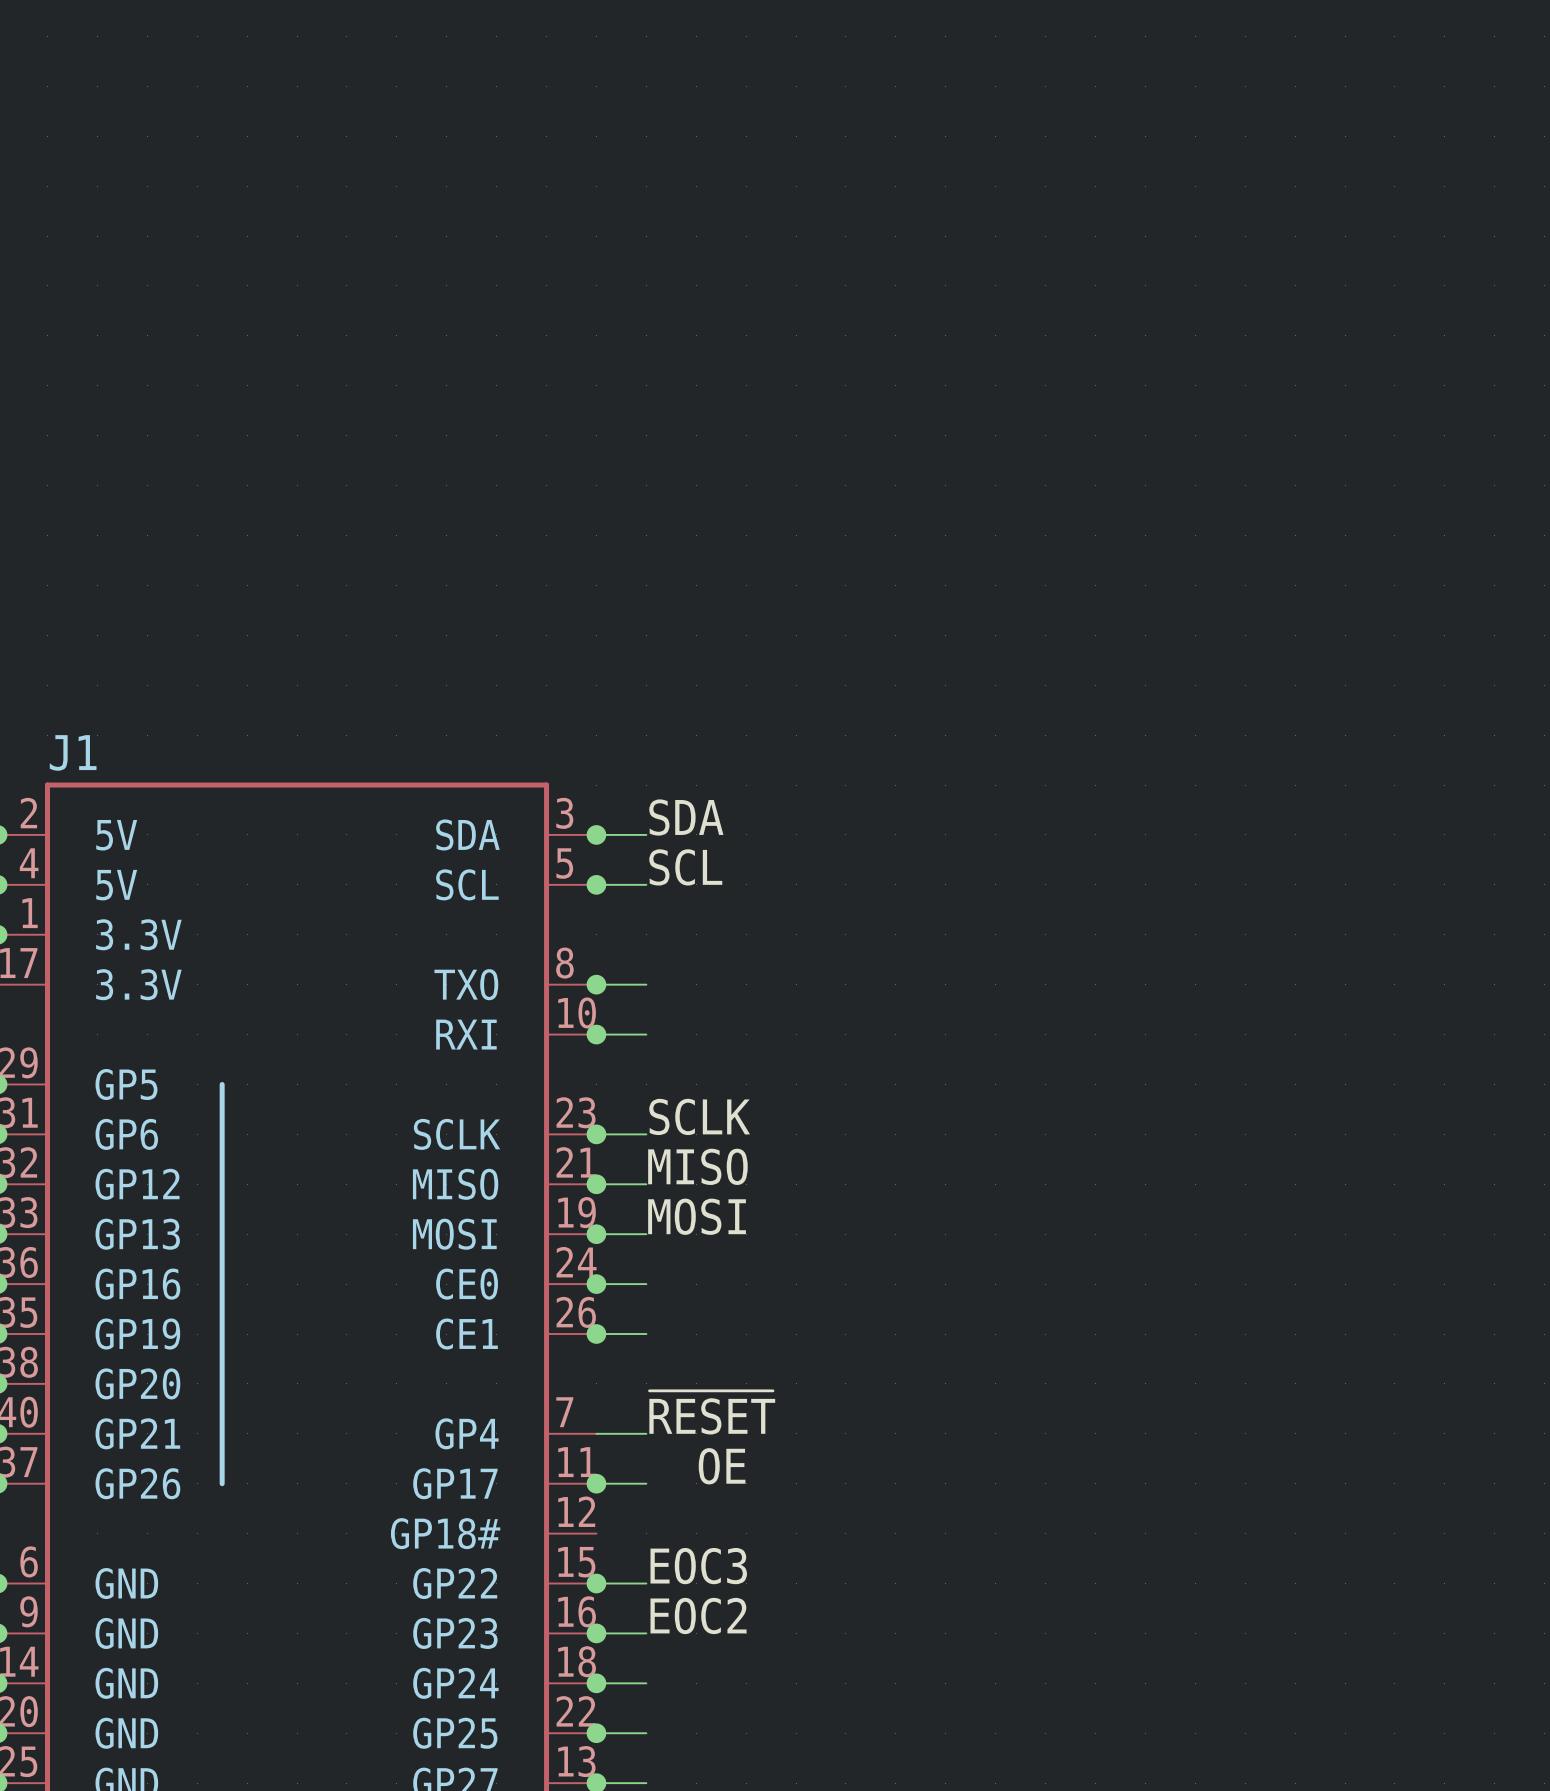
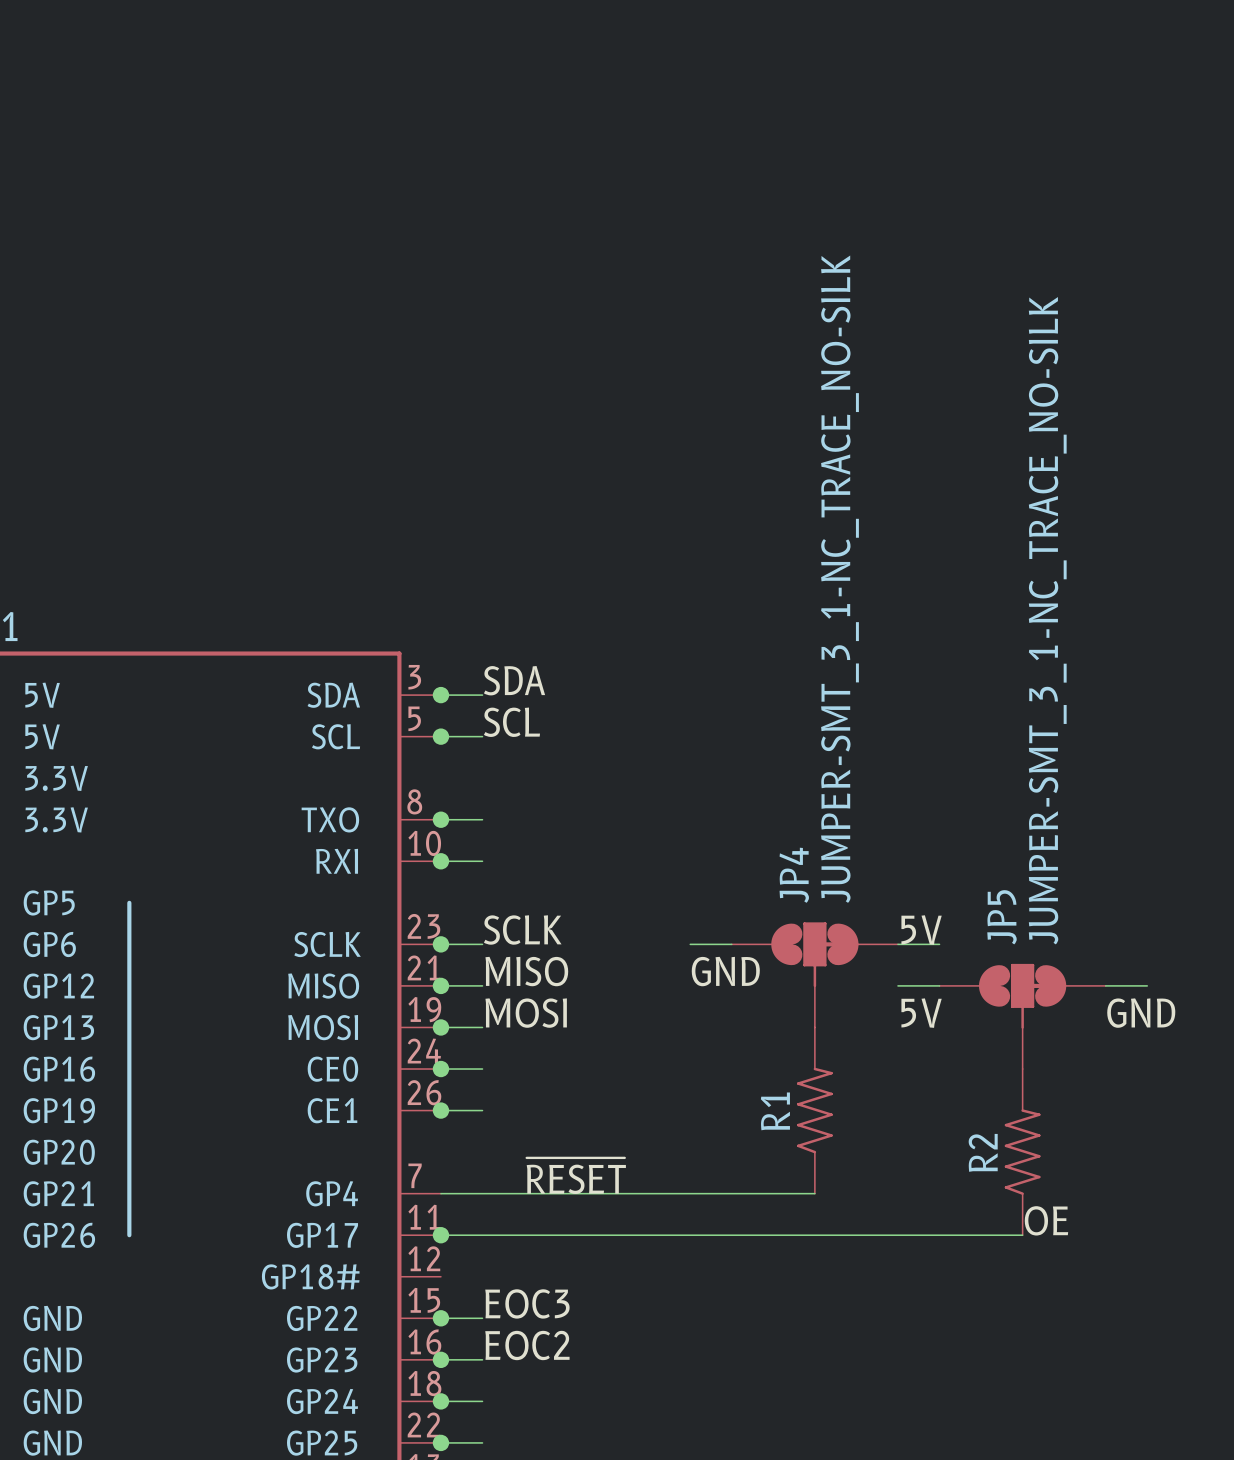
label: none -> 5V (921, 930)
wire: none -> (690, 944) (731, 944)
wire: none -> (897, 944) (939, 944)
label: none -> GND (725, 971)
JP4: none -> JUMPER-SMT_3_1-NC_TRACE_NO-SILK (814, 974)
wire: none -> (897, 985) (939, 985)
wire: none -> (1105, 985) (1147, 985)
label: none -> GND (1141, 1013)
label: none -> 5V (921, 1013)
JP5: none -> JUMPER-SMT_3_1-NC_TRACE_NO-SILK (1022, 1016)
R1: none -> (814, 1110)
R2: none -> (1022, 1152)
label position: ~{RESET} (712, 1412) -> ~{RESET} (576, 1175)
wire: none -> (482, 1193) (814, 1193)
label: OE (722, 1466) -> none
label: none -> OE (1046, 1220)
wire: none -> (482, 1235) (1022, 1235)

